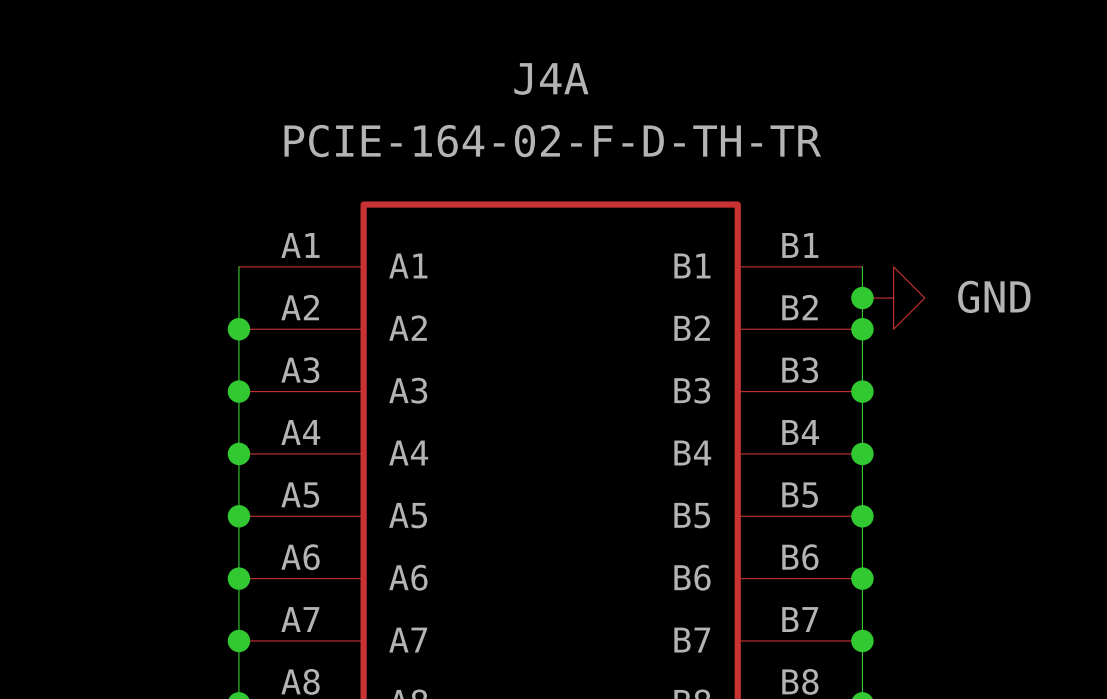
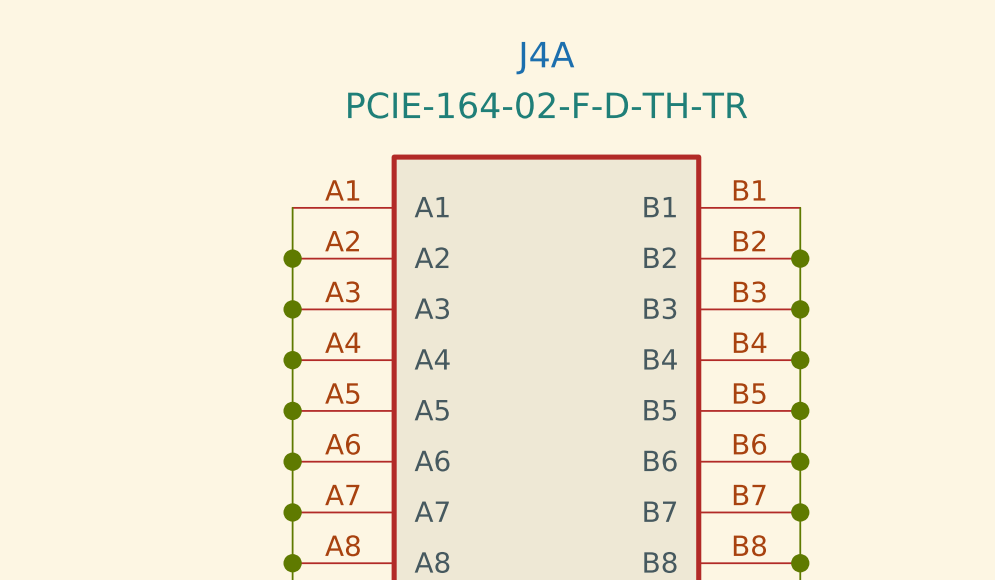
junction: (862, 298) -> none
power symbol: GND (893, 298) -> none

